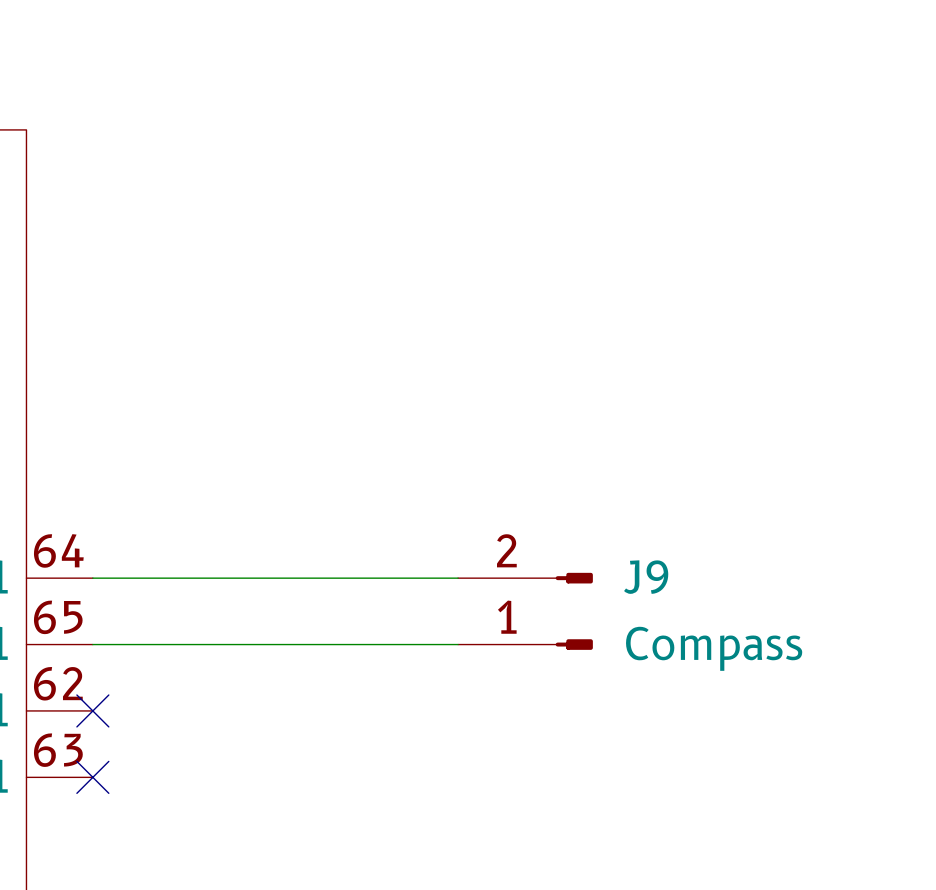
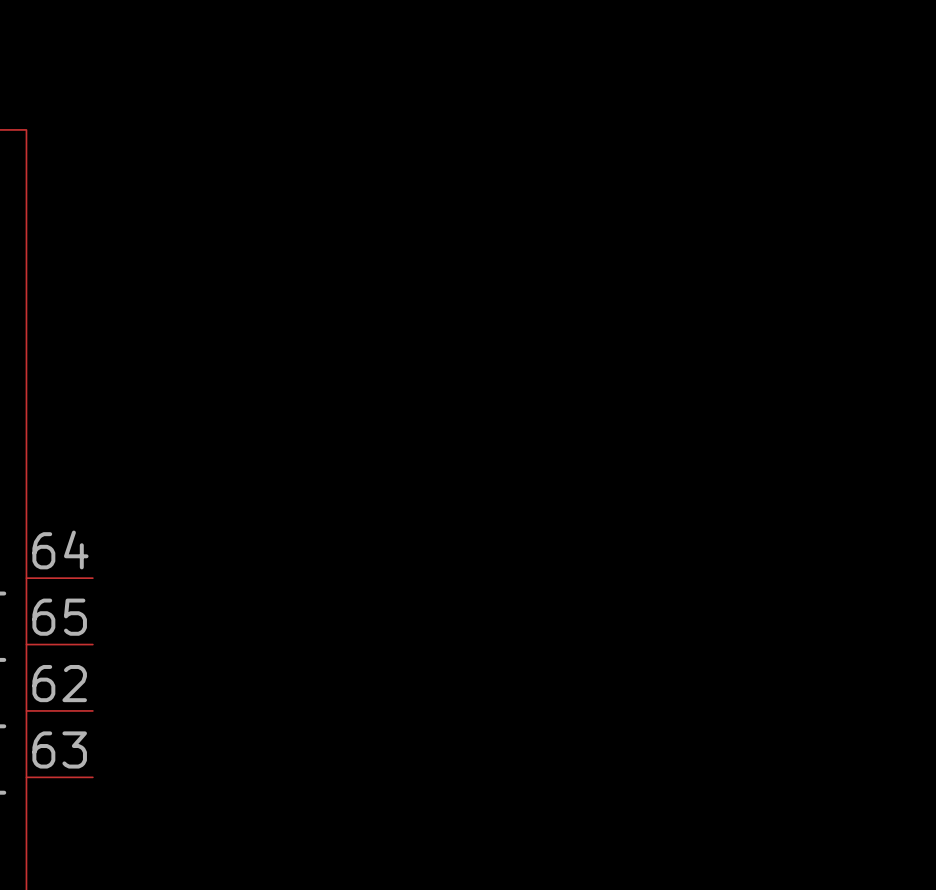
wire: (92, 578) (458, 578) -> none
J9: Compass (525, 611) -> none
wire: (92, 644) (458, 644) -> none
no-connect mark: (92, 710) -> none
no-connect mark: (92, 777) -> none

